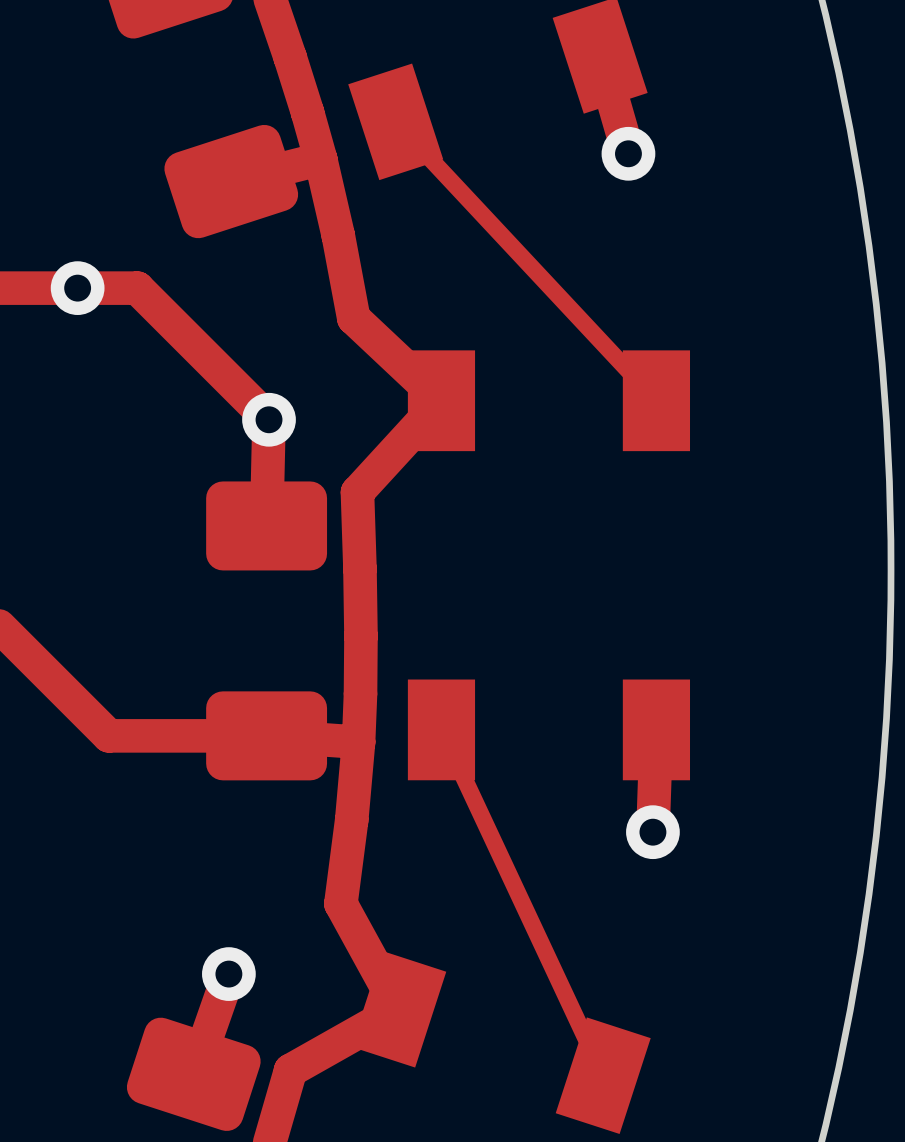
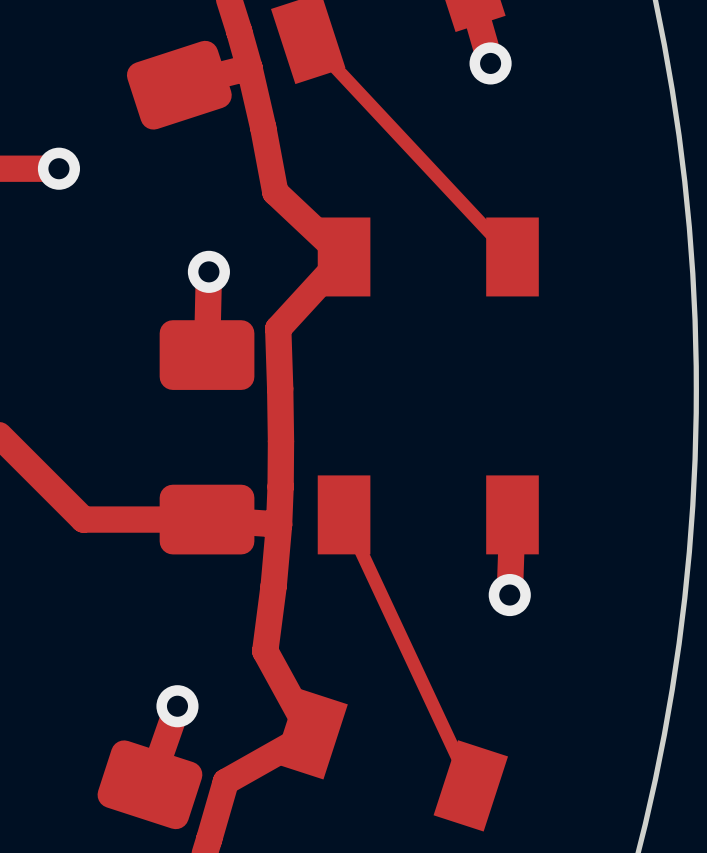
top track: (77, 288) (137, 288) (269, 419) -> none

